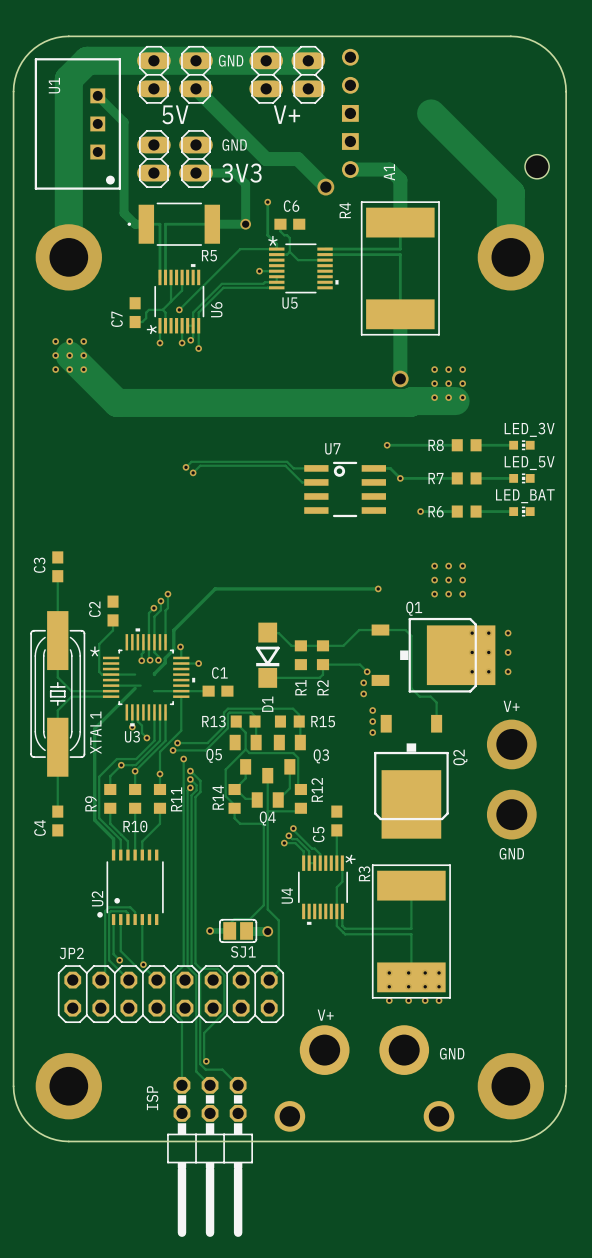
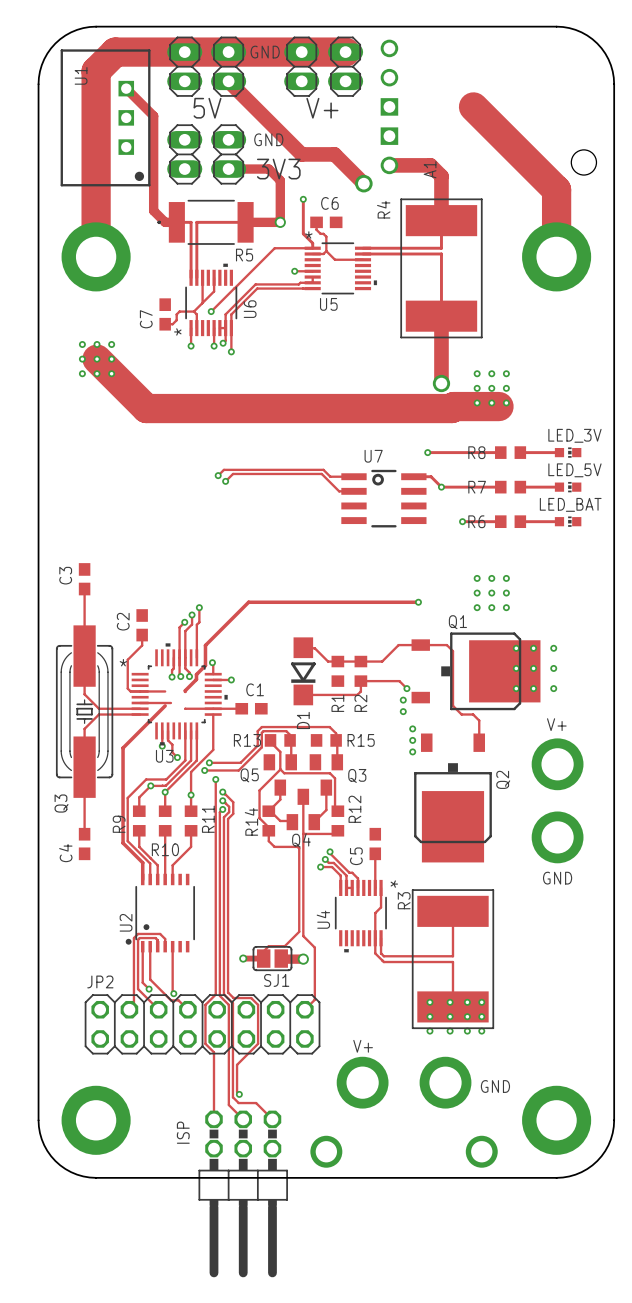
XTAL1 name: XTAL1 (95, 732) -> Q3 (61, 803)

